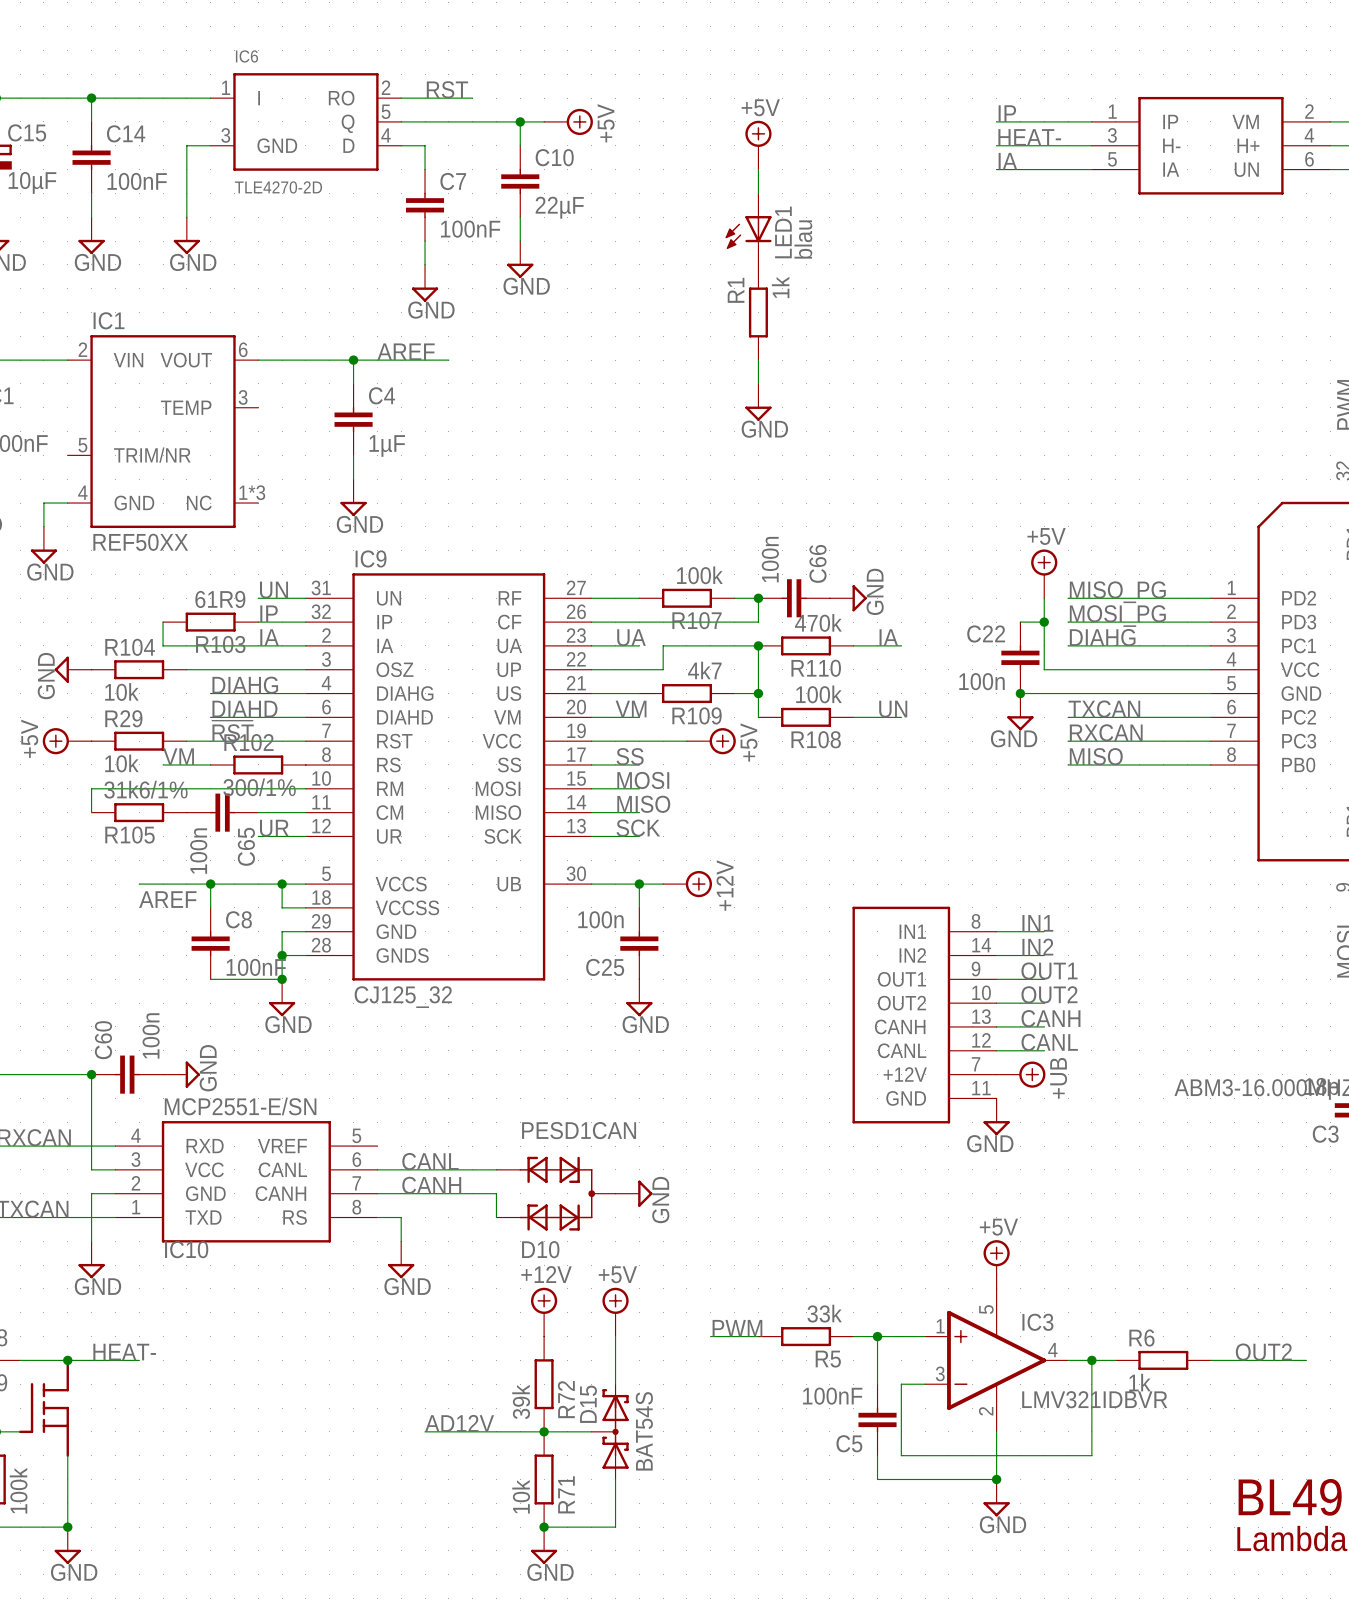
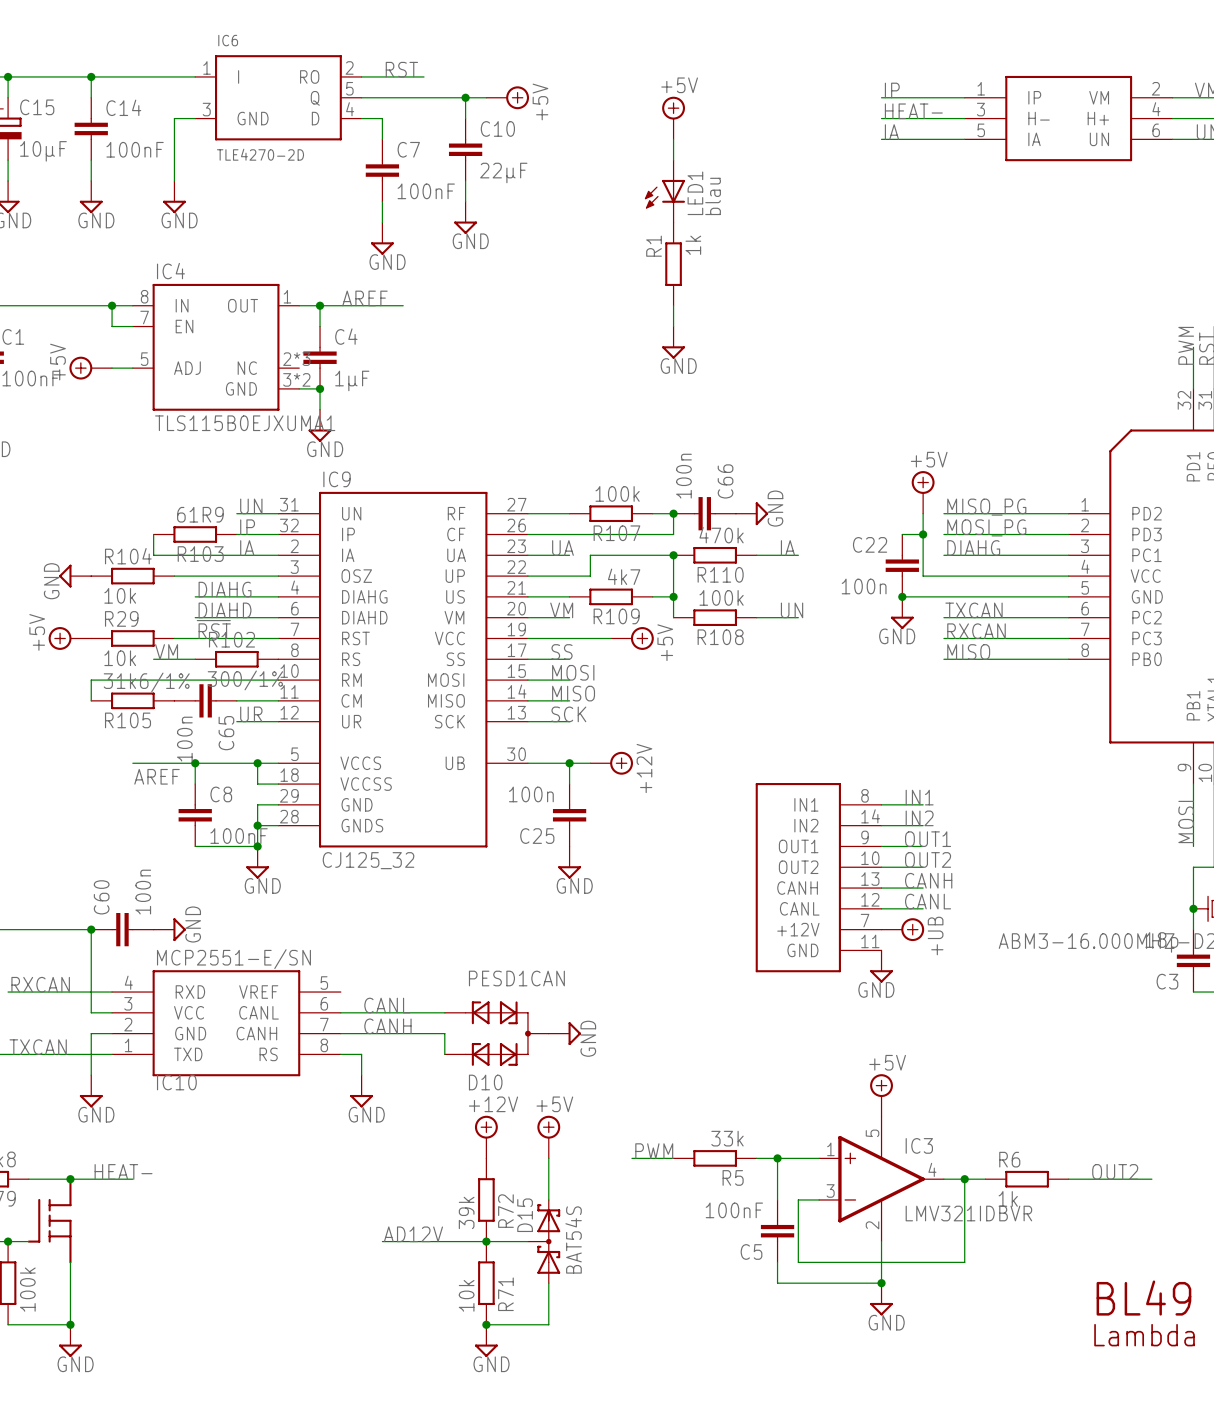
wire: none -> (112, 305) (112, 326) (132, 326)
junction: none -> (112, 305)
wire: (258, 360) (329, 360) -> (70, 305) (132, 305)
IC4: none -> TLS115B0EJXUMA1 (216, 347)
power symbol: none -> +5V (90, 368)
wire: none -> (112, 368) (132, 368)
IC1: REF50XX (163, 431) -> none
wire: none -> (299, 388) (320, 388)
junction: none -> (320, 388)
wire: (67, 503) (43, 503) (43, 526) -> none
power symbol: GND (43, 545) -> none

